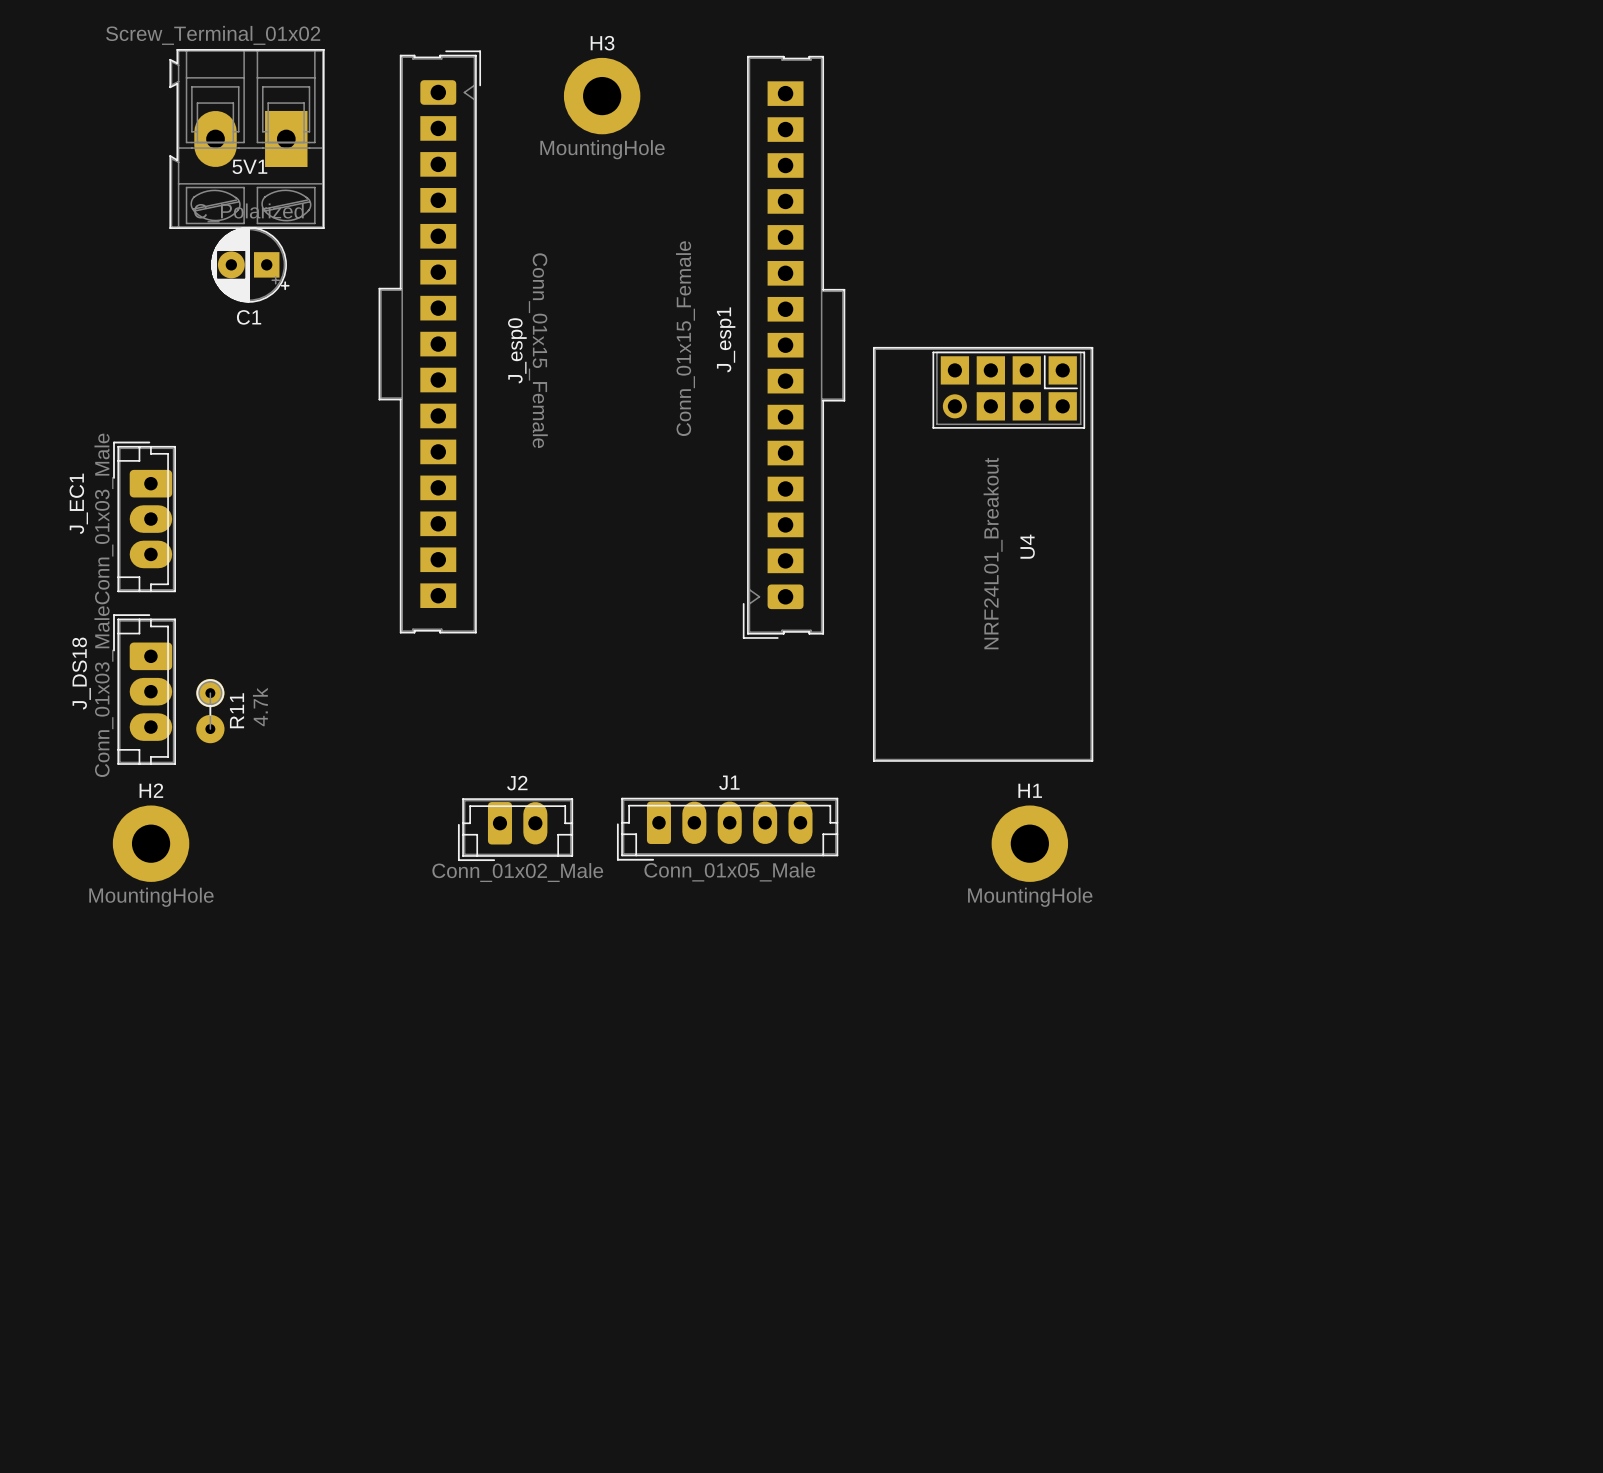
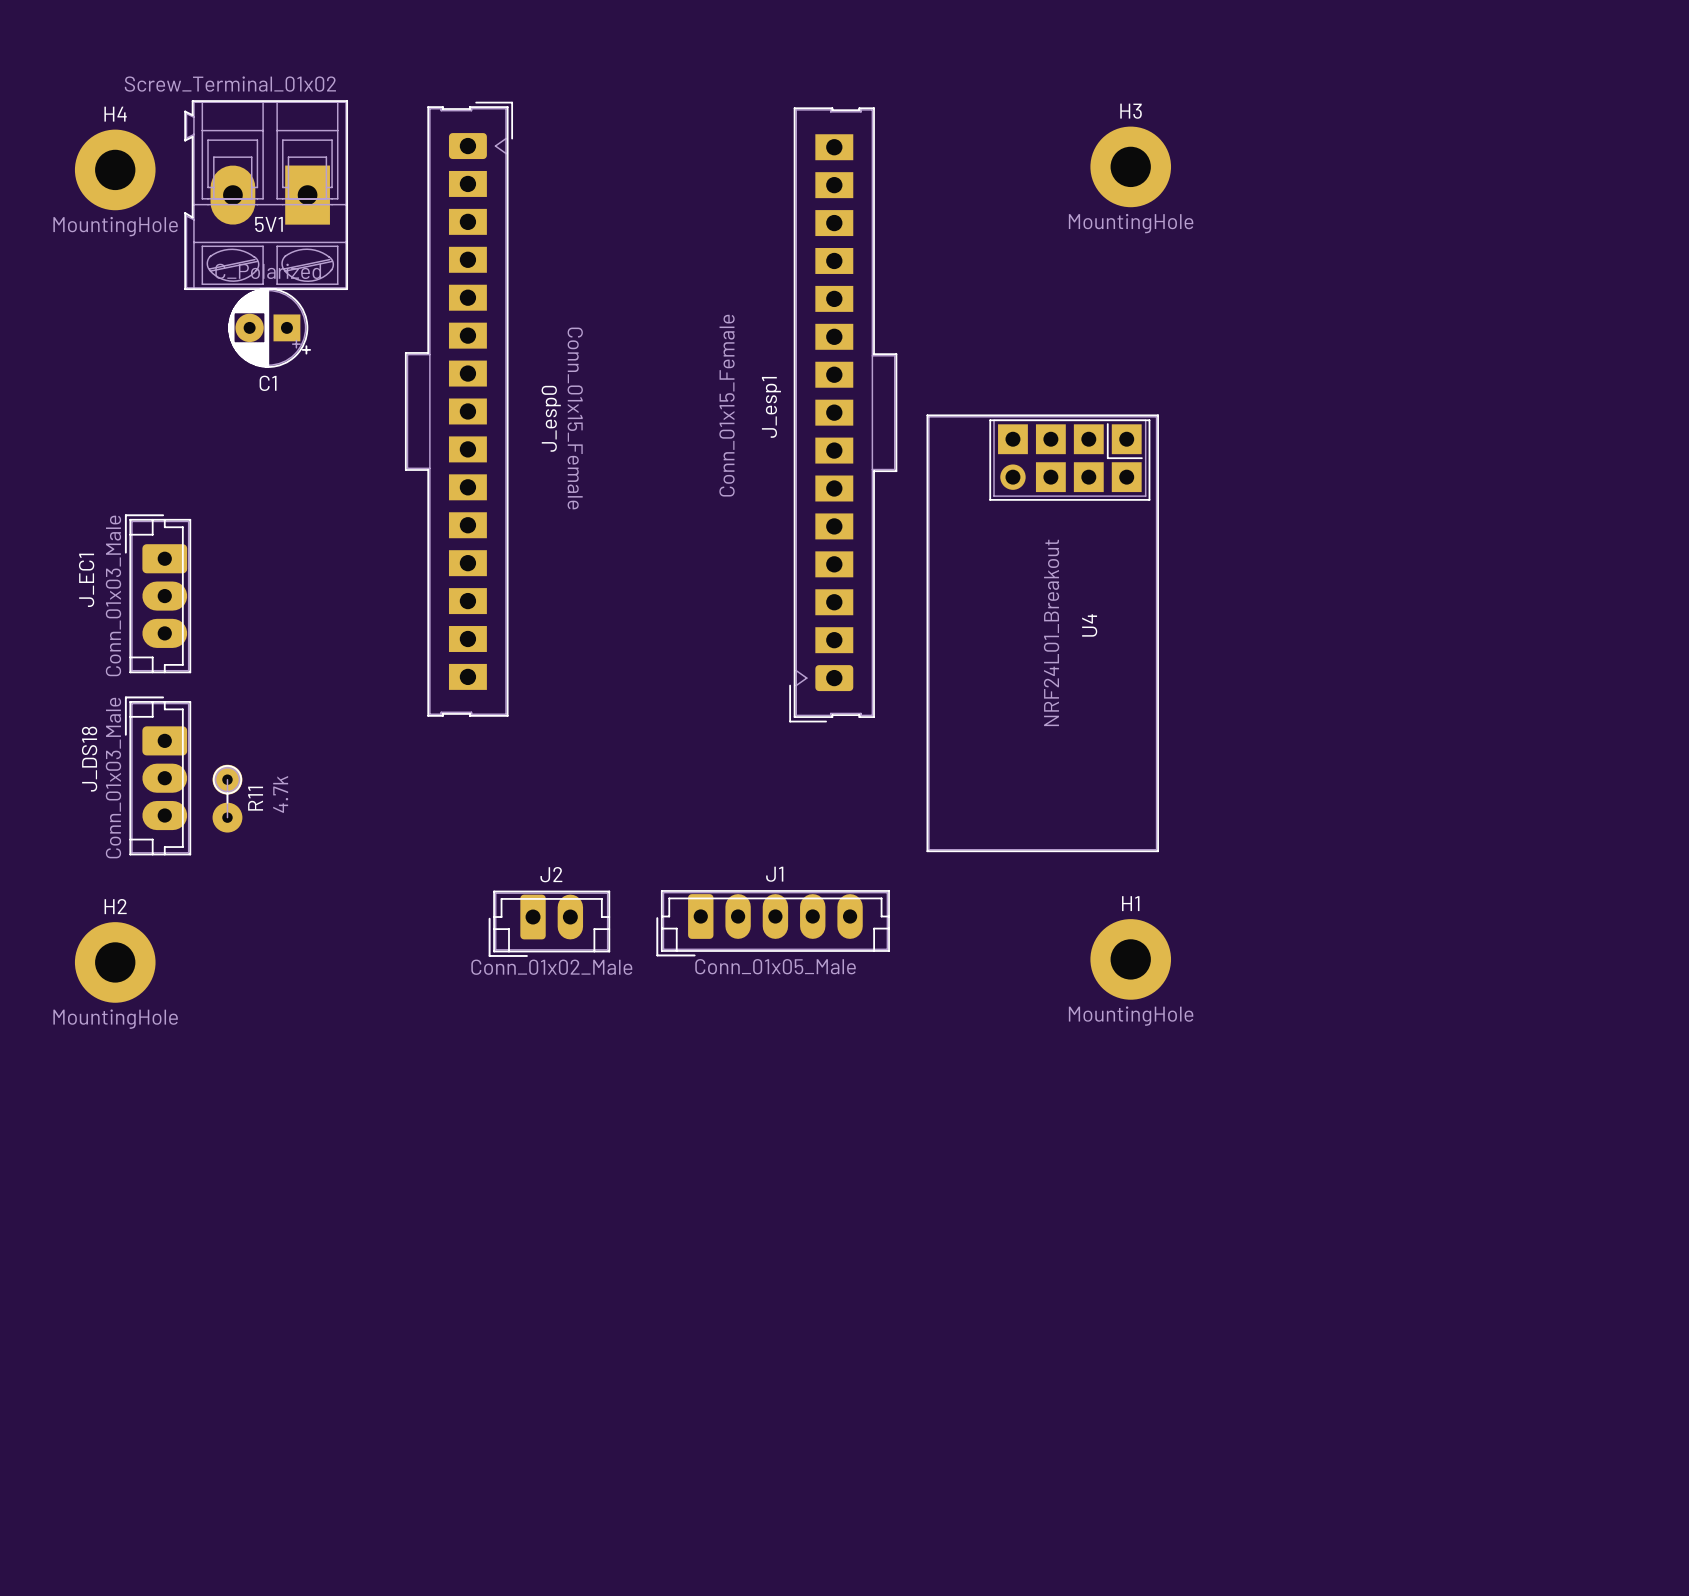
H3 position: (602, 96) -> (1130, 166)
H4: none -> MountingHole (115, 169)
H2 position: (151, 843) -> (115, 962)
H1 position: (1029, 843) -> (1130, 959)

